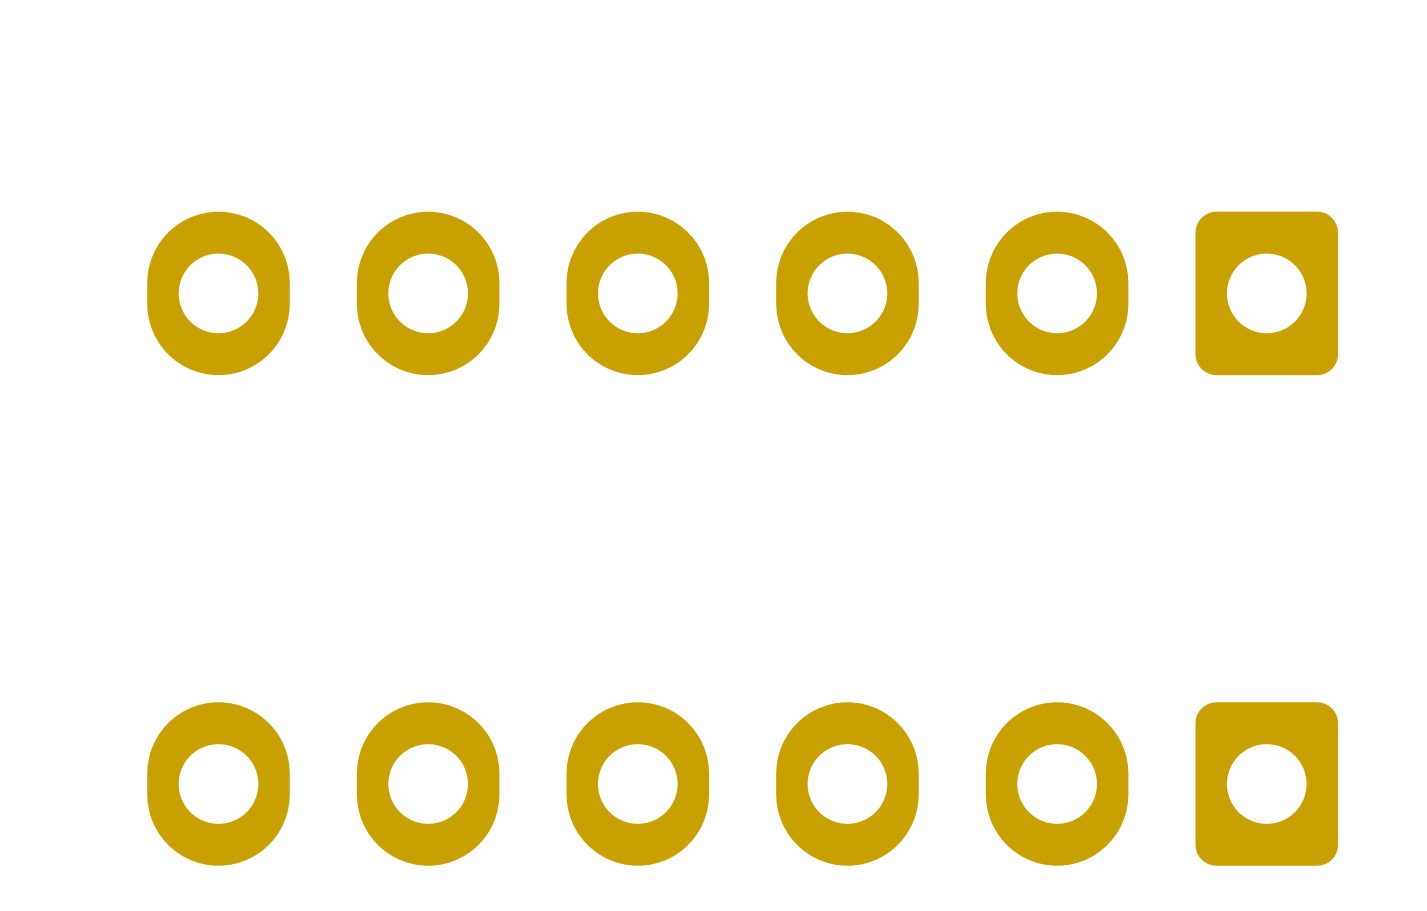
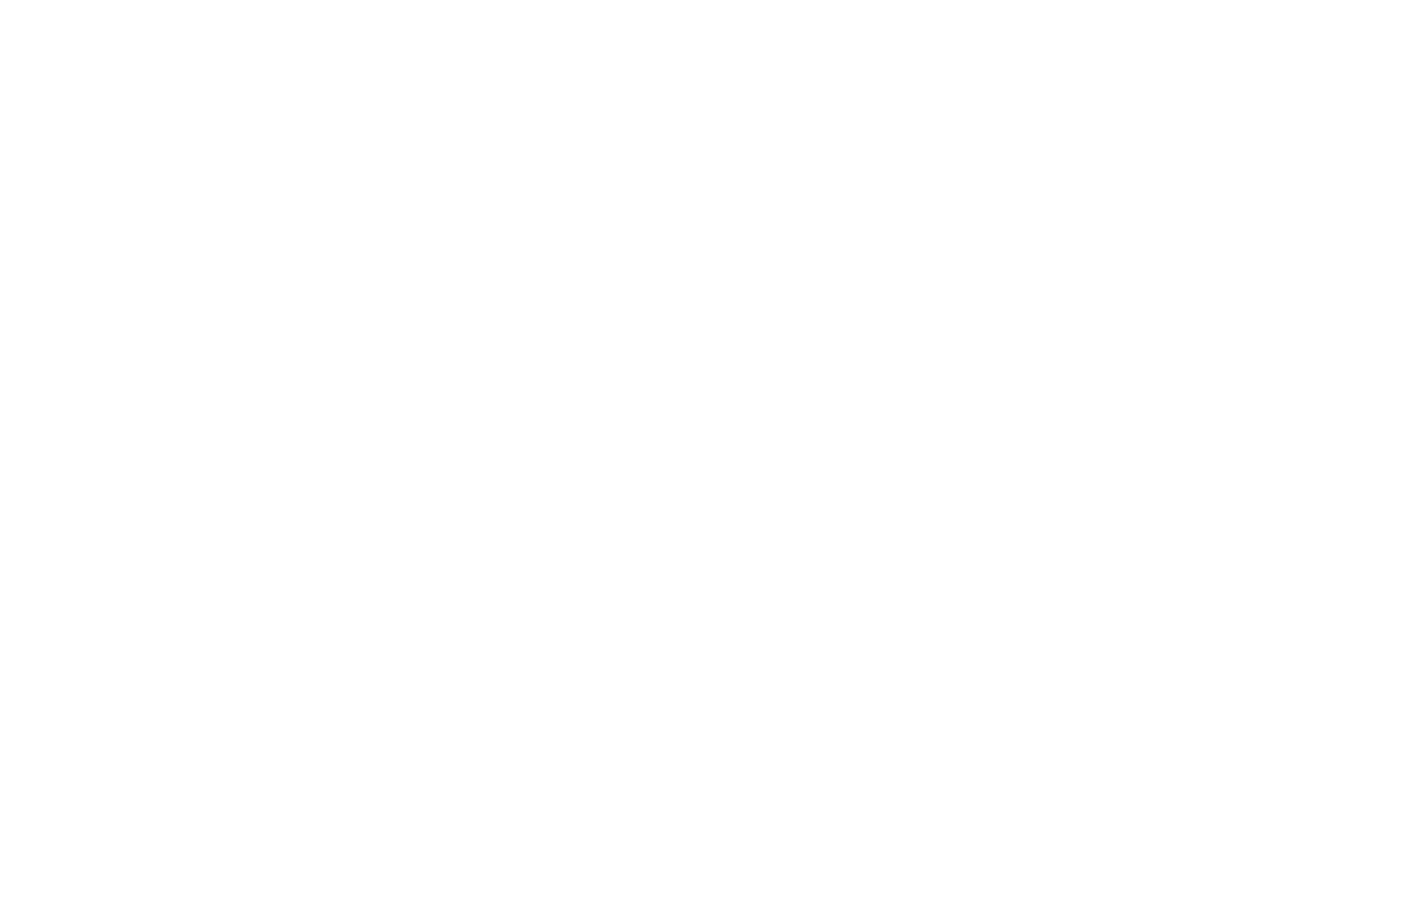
part: (742, 293) -> none
part: (742, 784) -> none

